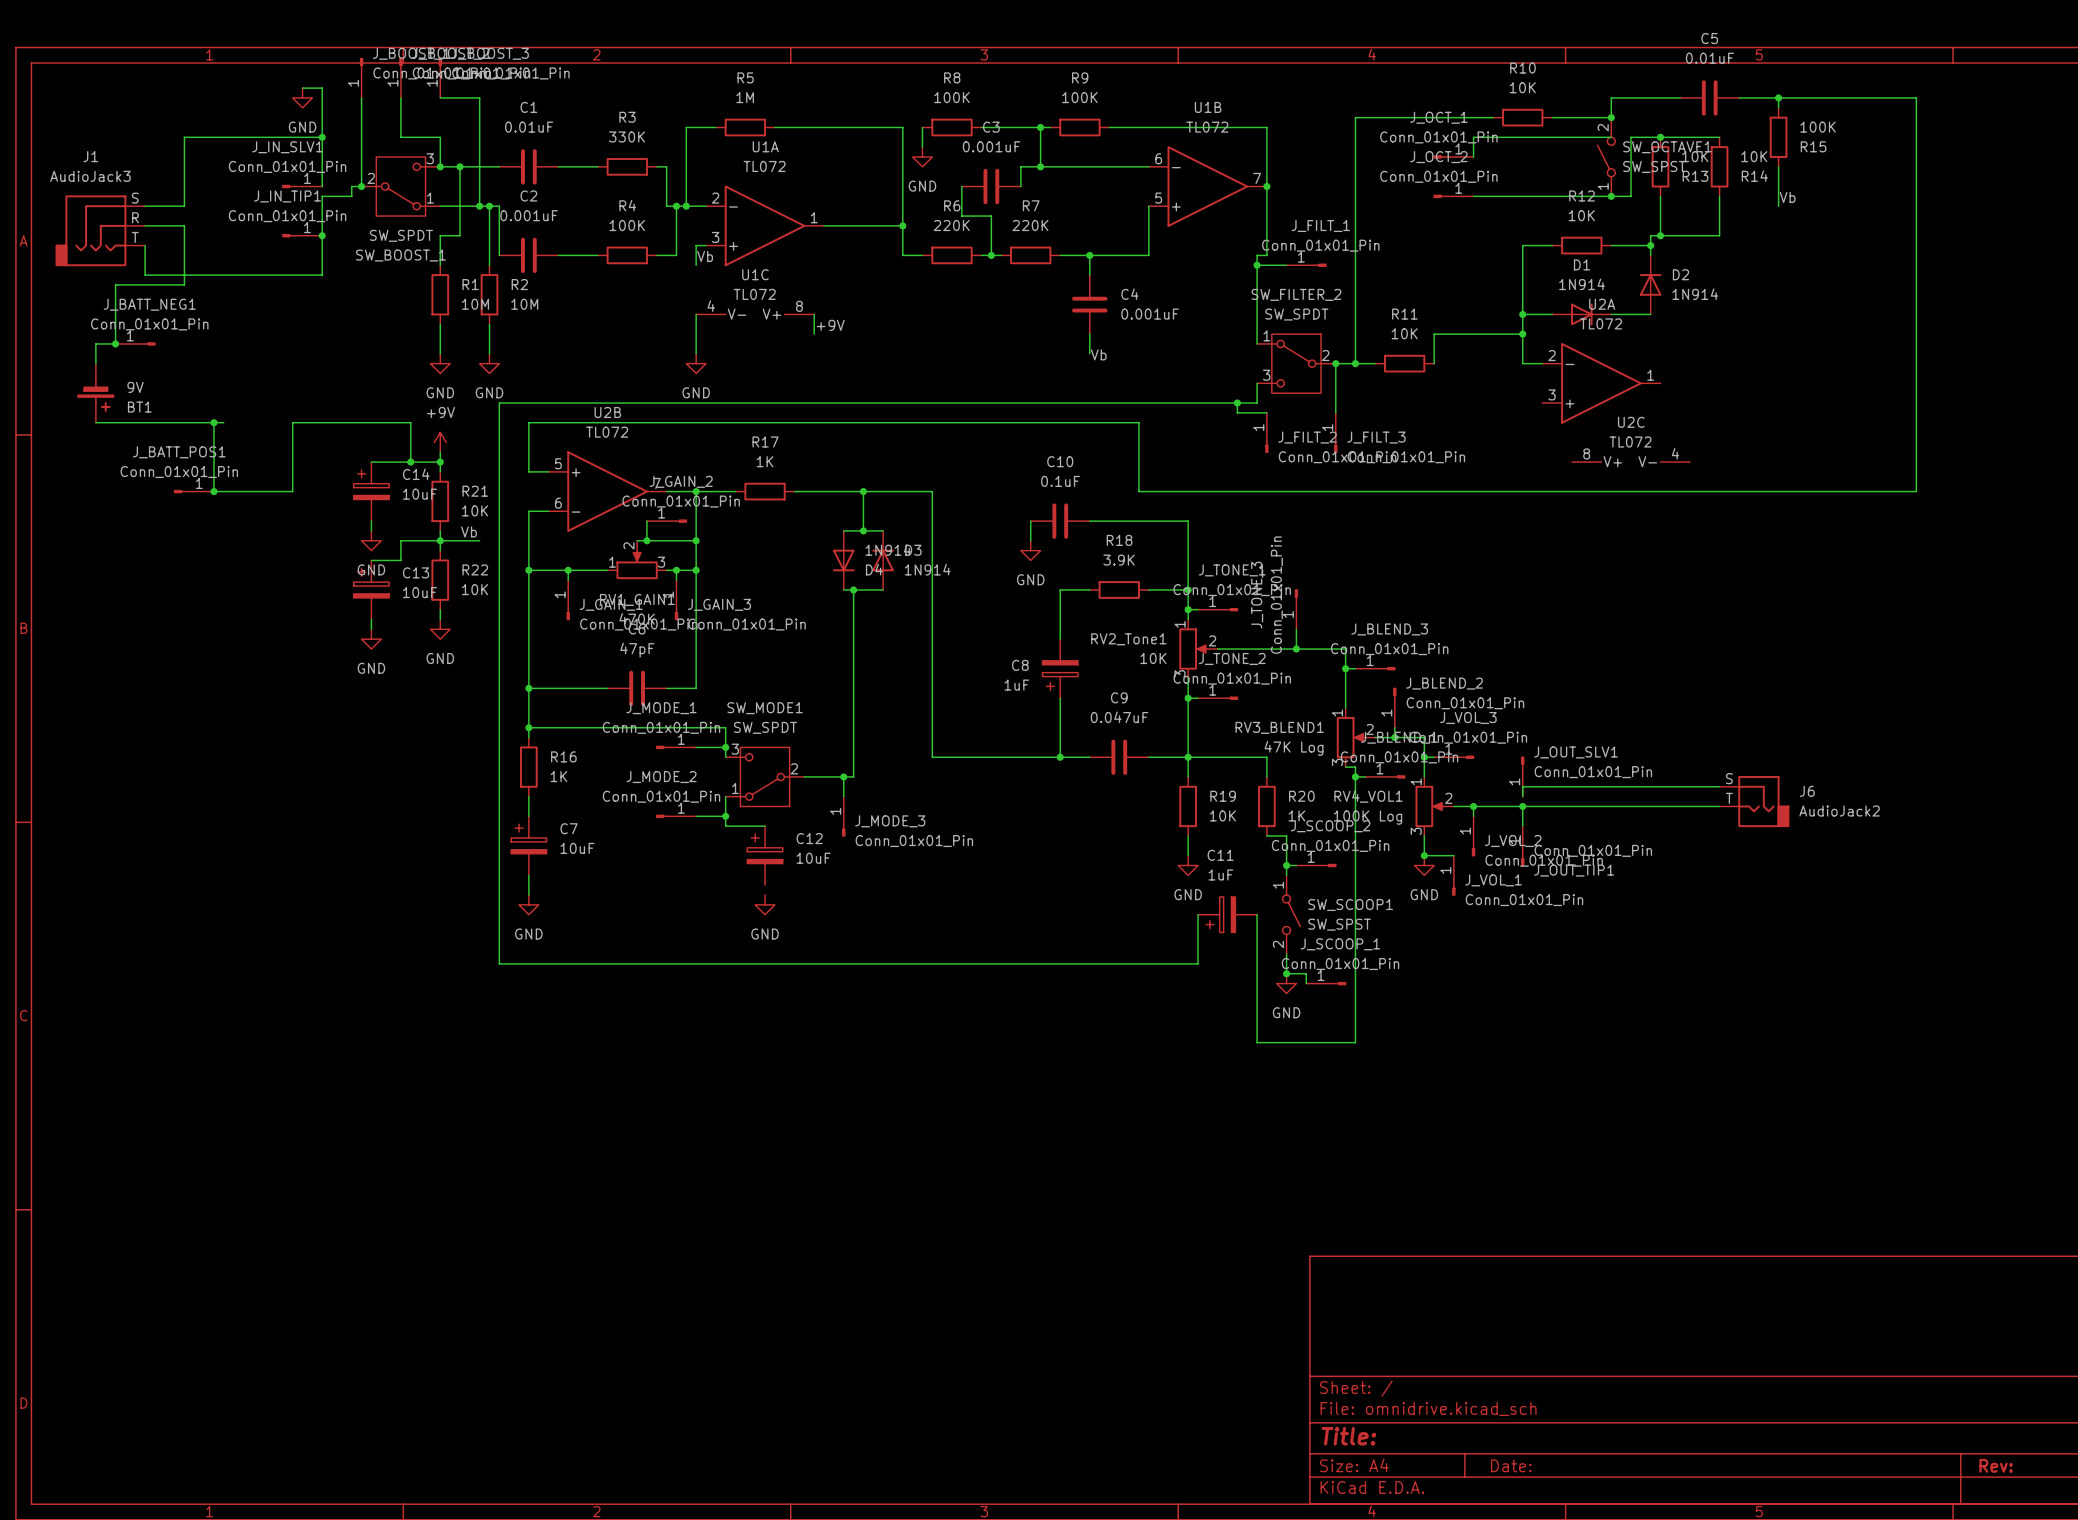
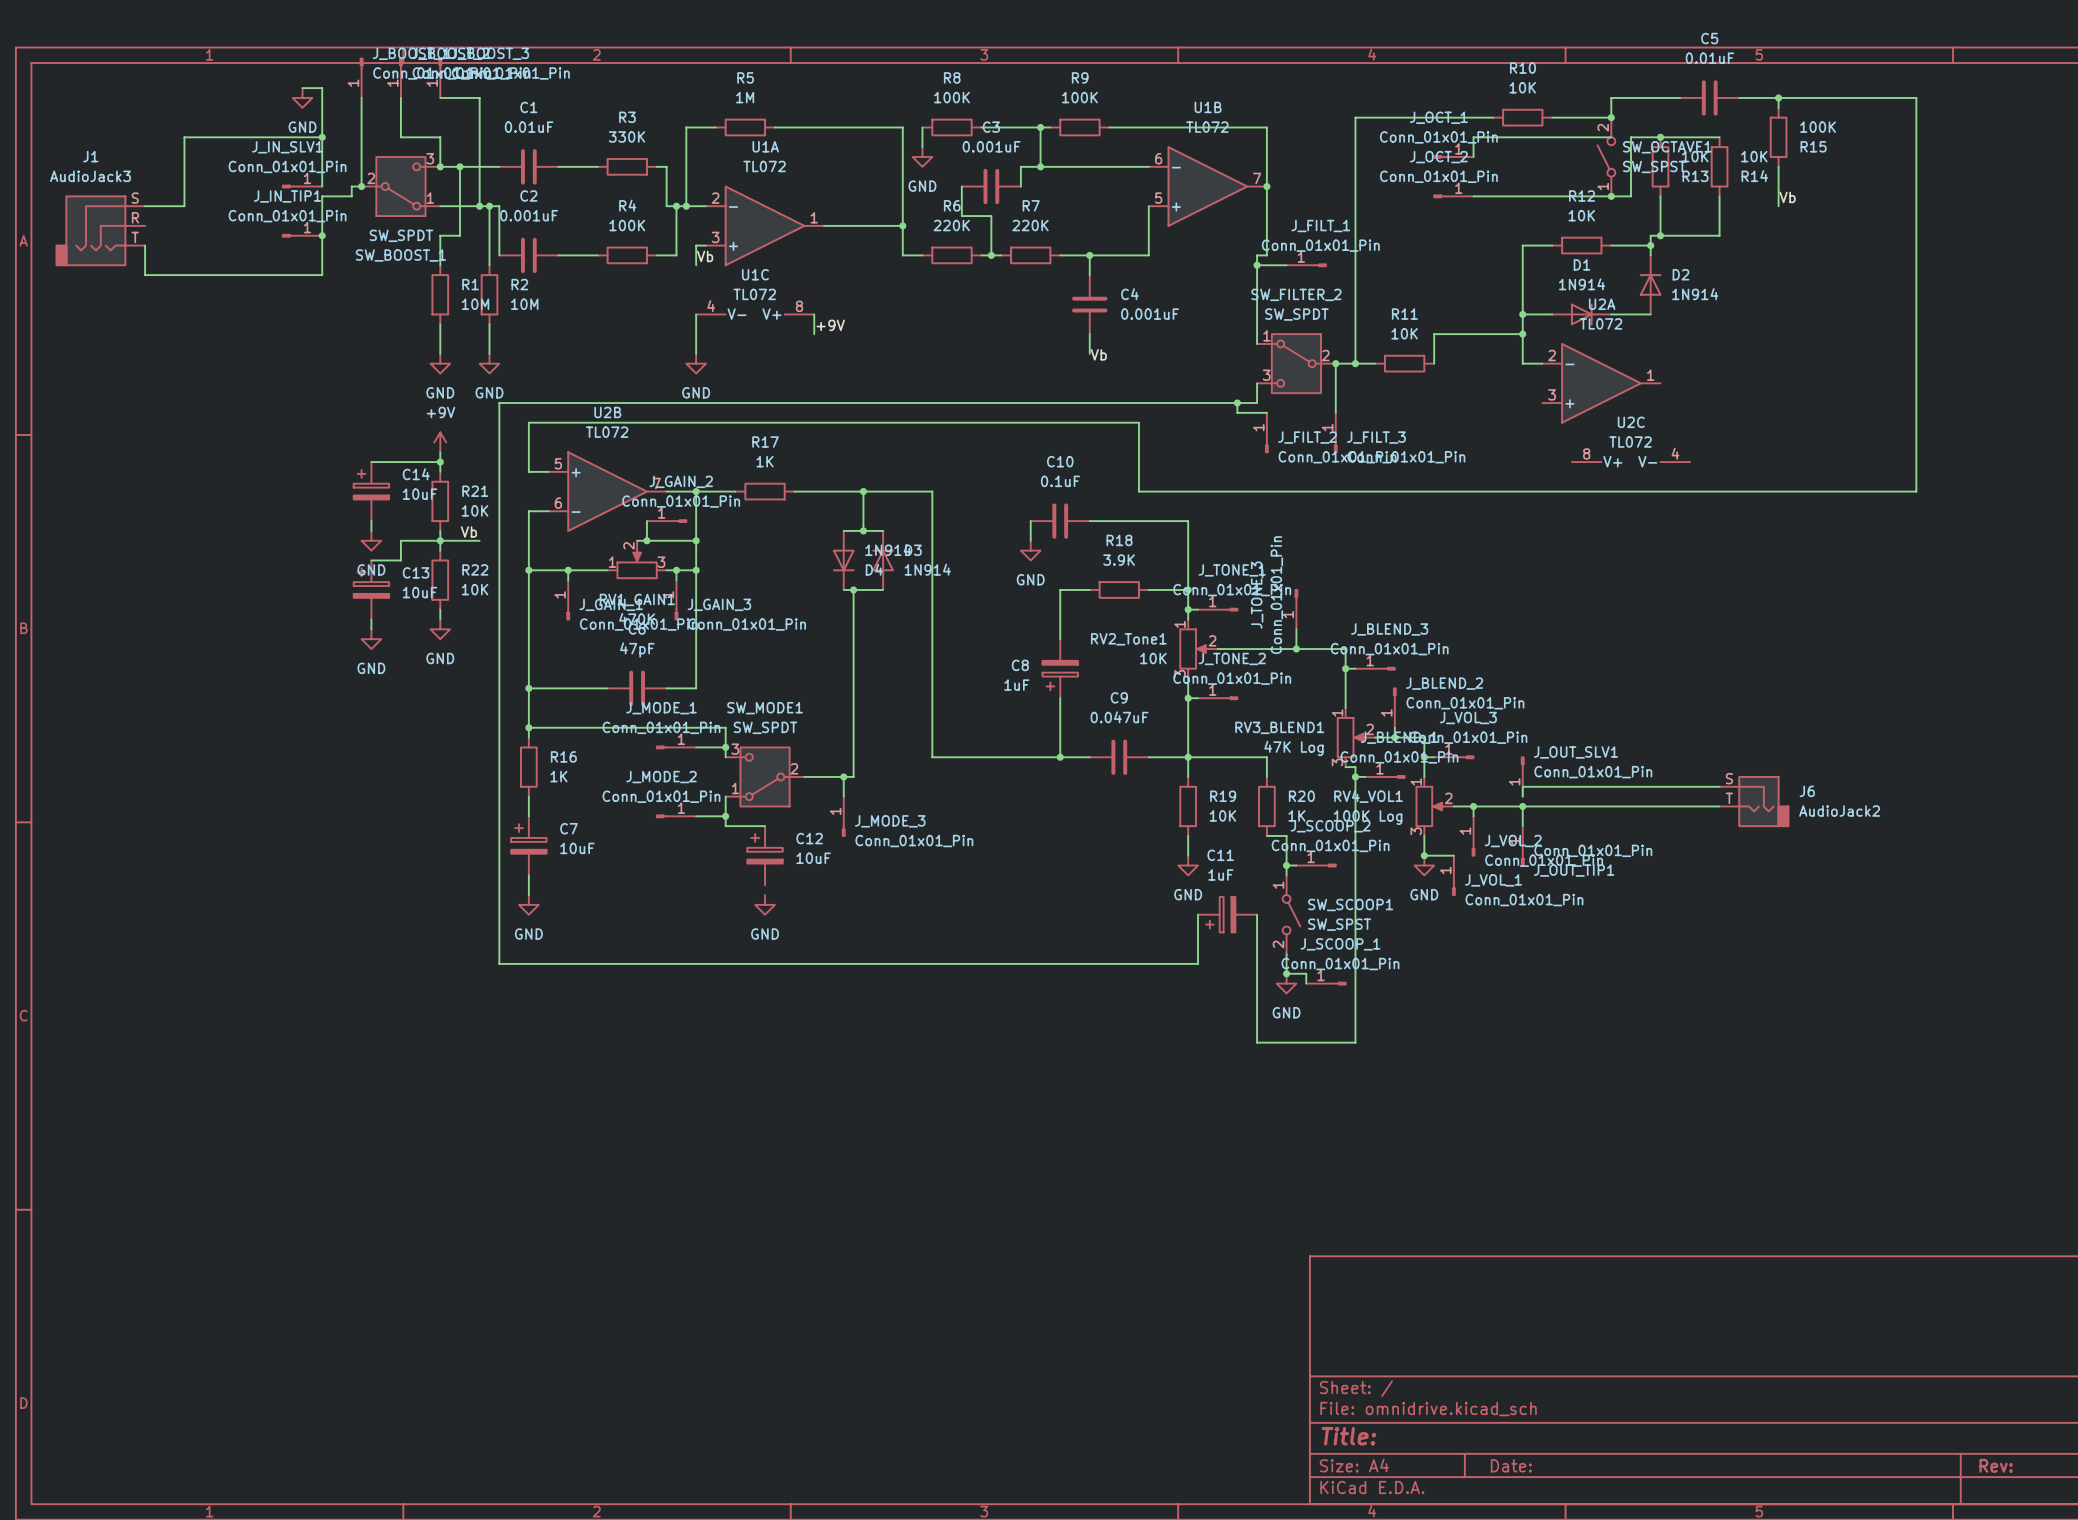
wire: (145, 225) (184, 225) (184, 284) (115, 284) (115, 343) (95, 343) (95, 363) -> none
junction: (115, 343) -> none
J_BATT_NEG1: Conn_01x01_Pin (135, 343) -> none
BT1: 9V (95, 393) -> none
wire: (95, 422) (223, 422) -> none
wire: (213, 422) (213, 491) (292, 491) (292, 422) (410, 422) (410, 462) -> none
junction: (213, 422) -> none
junction: (410, 462) -> none
J_BATT_POS1: Conn_01x01_Pin (193, 491) -> none
junction: (213, 491) -> none

